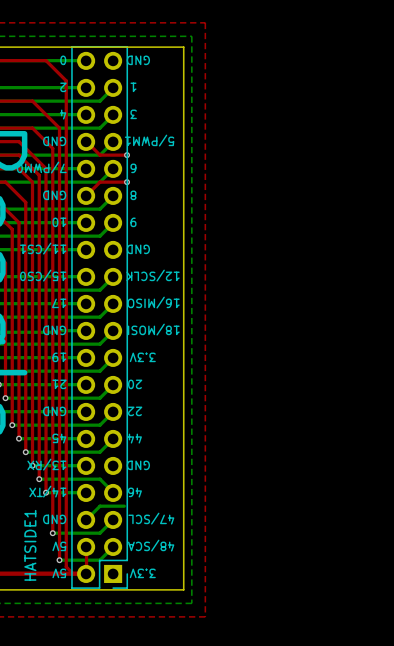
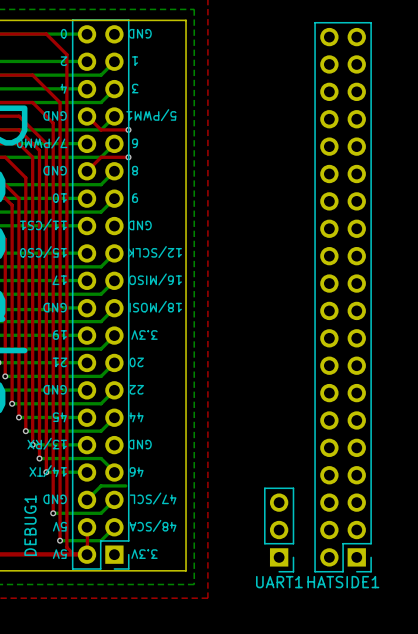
HATSIDE1: none -> (343, 297)
HATSIDE1 name: HATSIDE1 (30, 545) -> DEBUG1 (30, 525)
UART1: none -> (279, 530)

